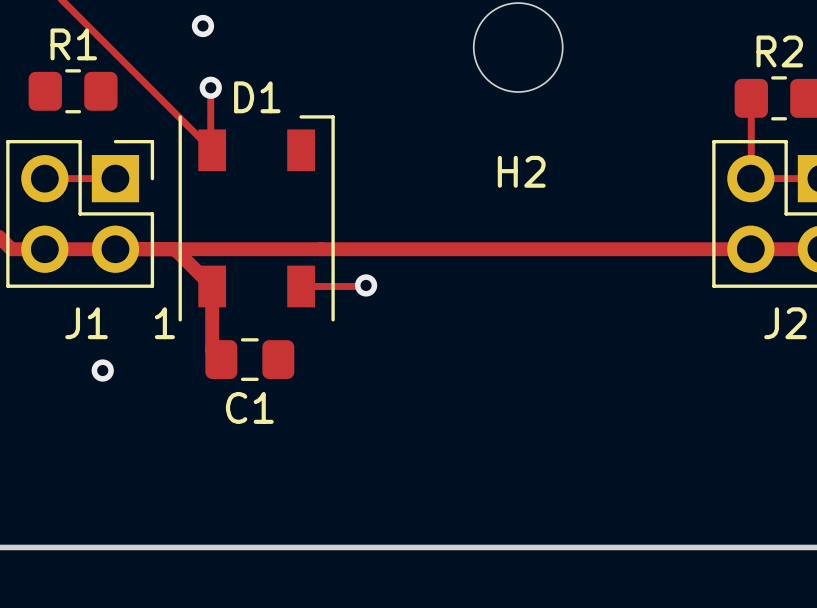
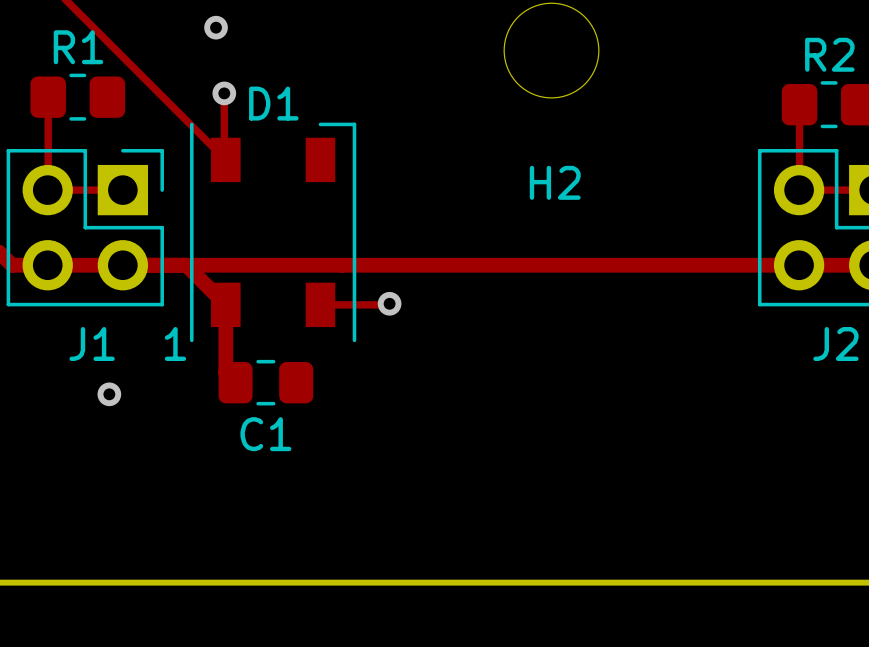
track: none -> (48, 97) (47, 190)

